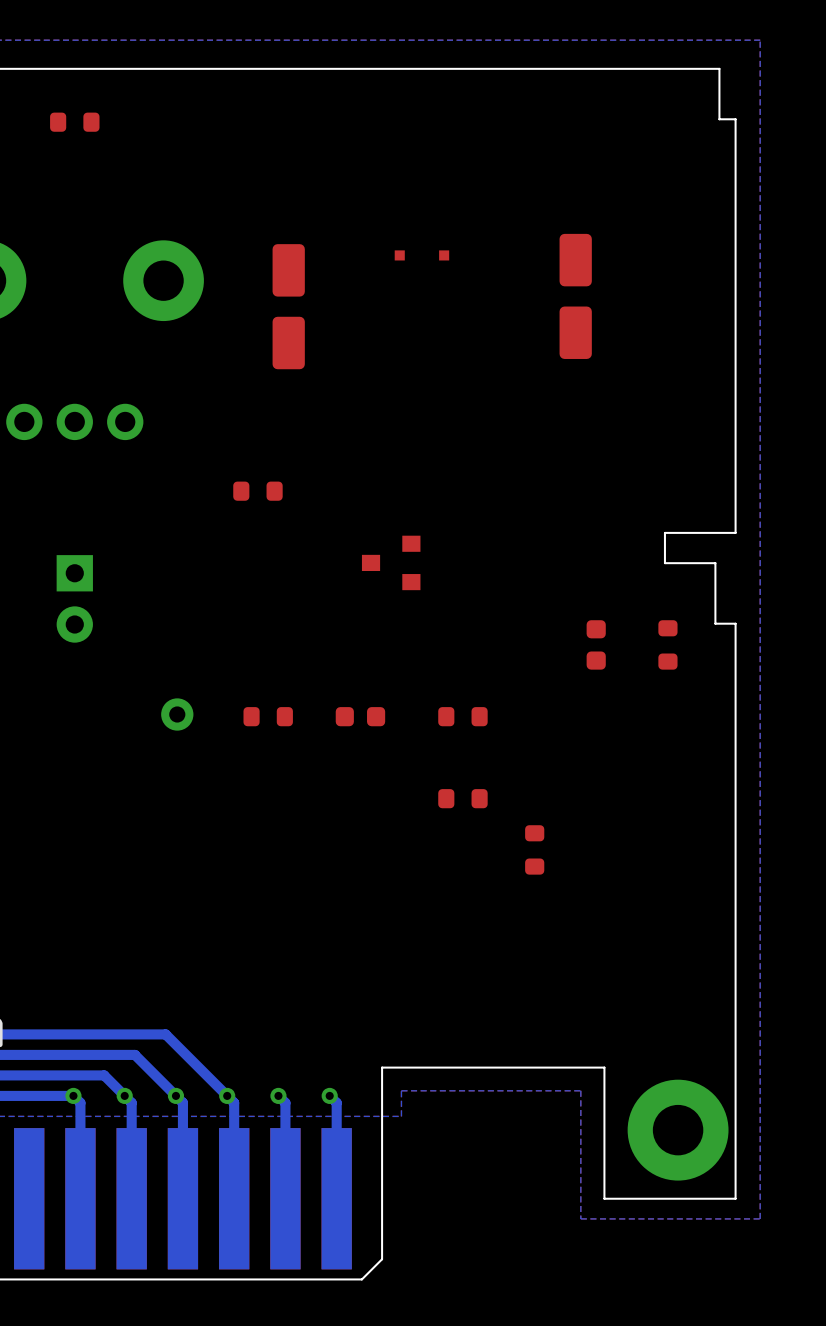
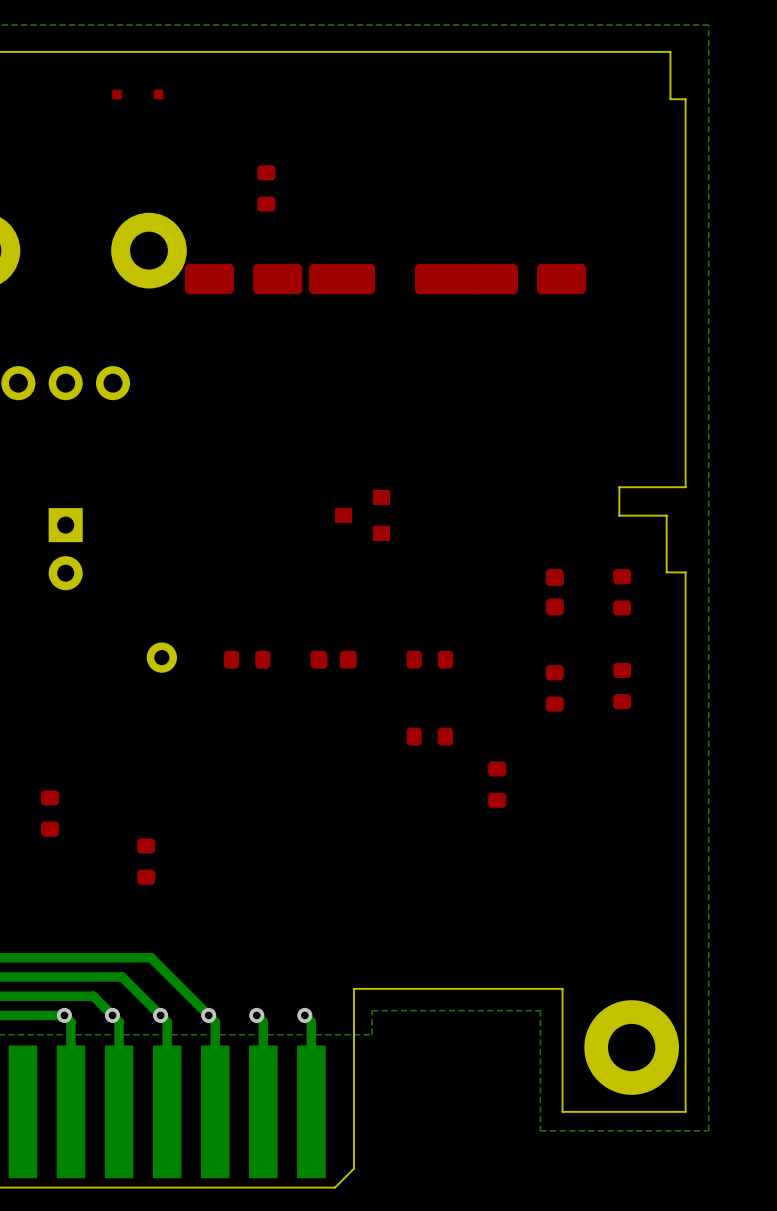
part: (74, 122) -> none
part: none -> (266, 188)
part position: (421, 255) -> (137, 94)
part rotation: 0° (575, 296) -> 90° clockwise (527, 279)
part rotation: 0° (288, 306) -> 90° clockwise (243, 279)
part: none -> (395, 279)
part: (257, 491) -> none
part: none -> (622, 685)
part: none -> (554, 688)
part: none -> (50, 813)
part: none -> (146, 861)

